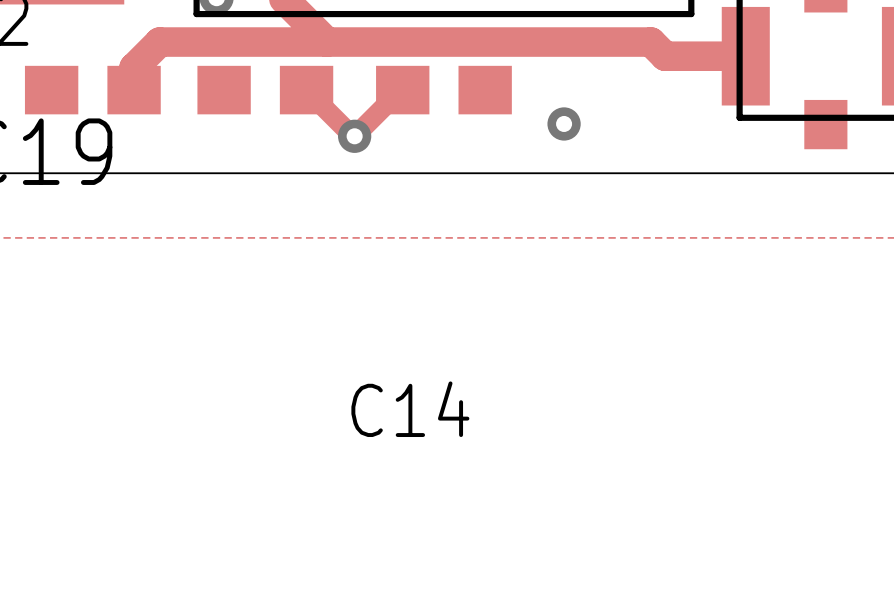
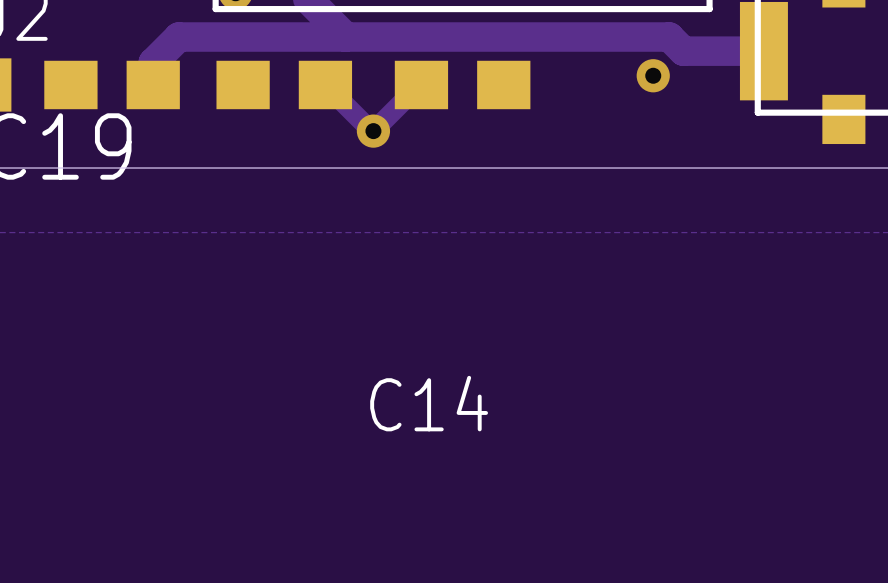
via position: (564, 123) -> (653, 75)

